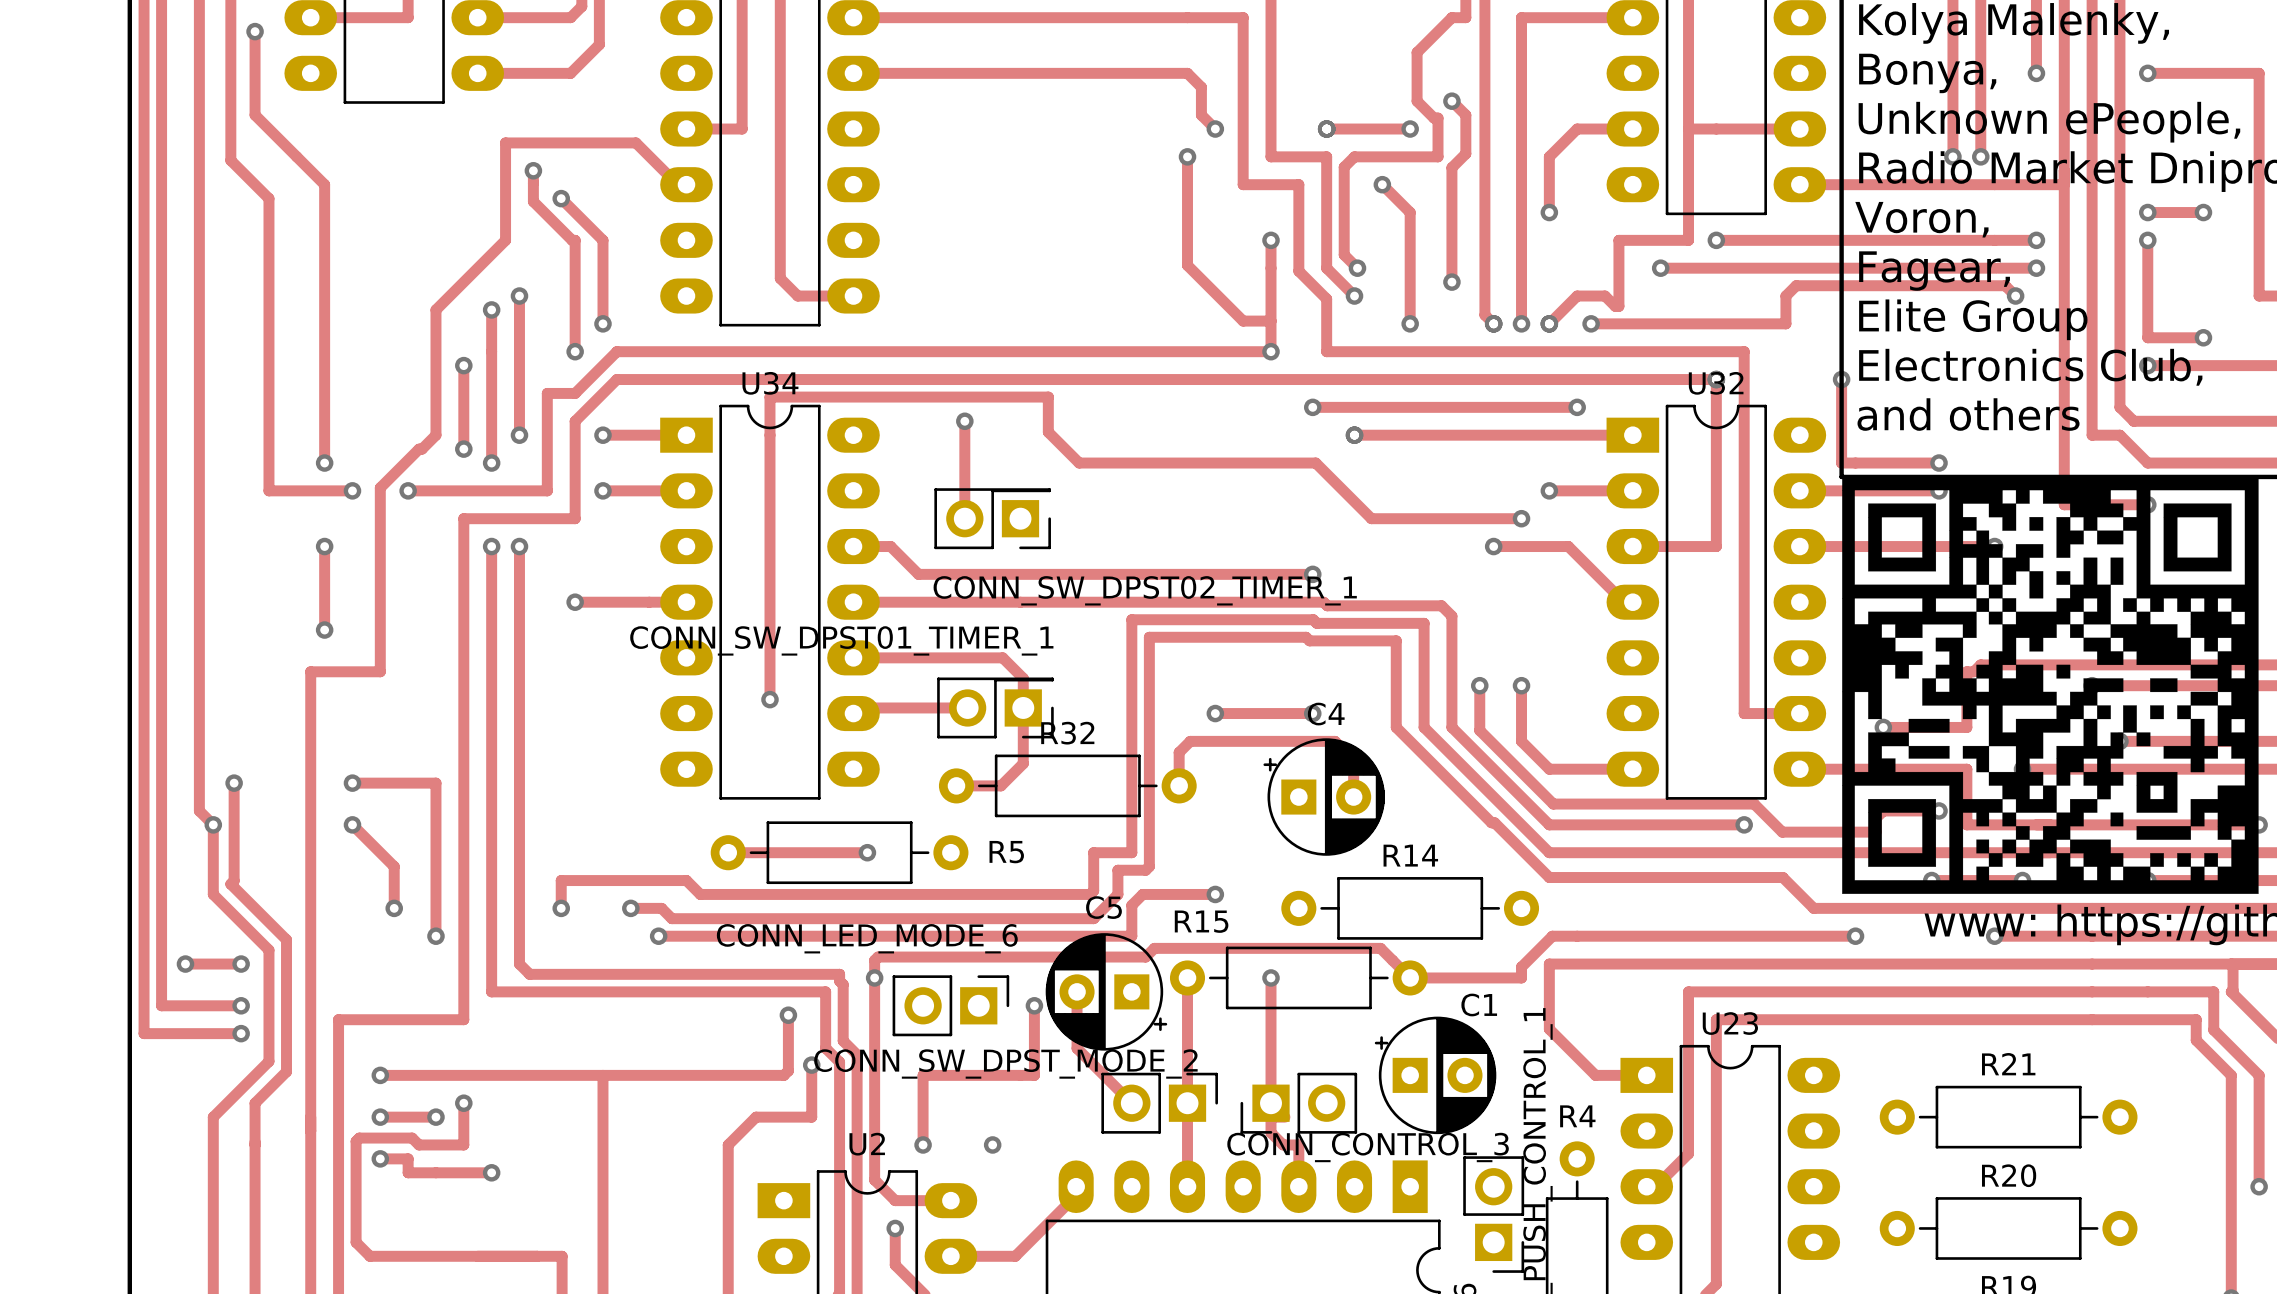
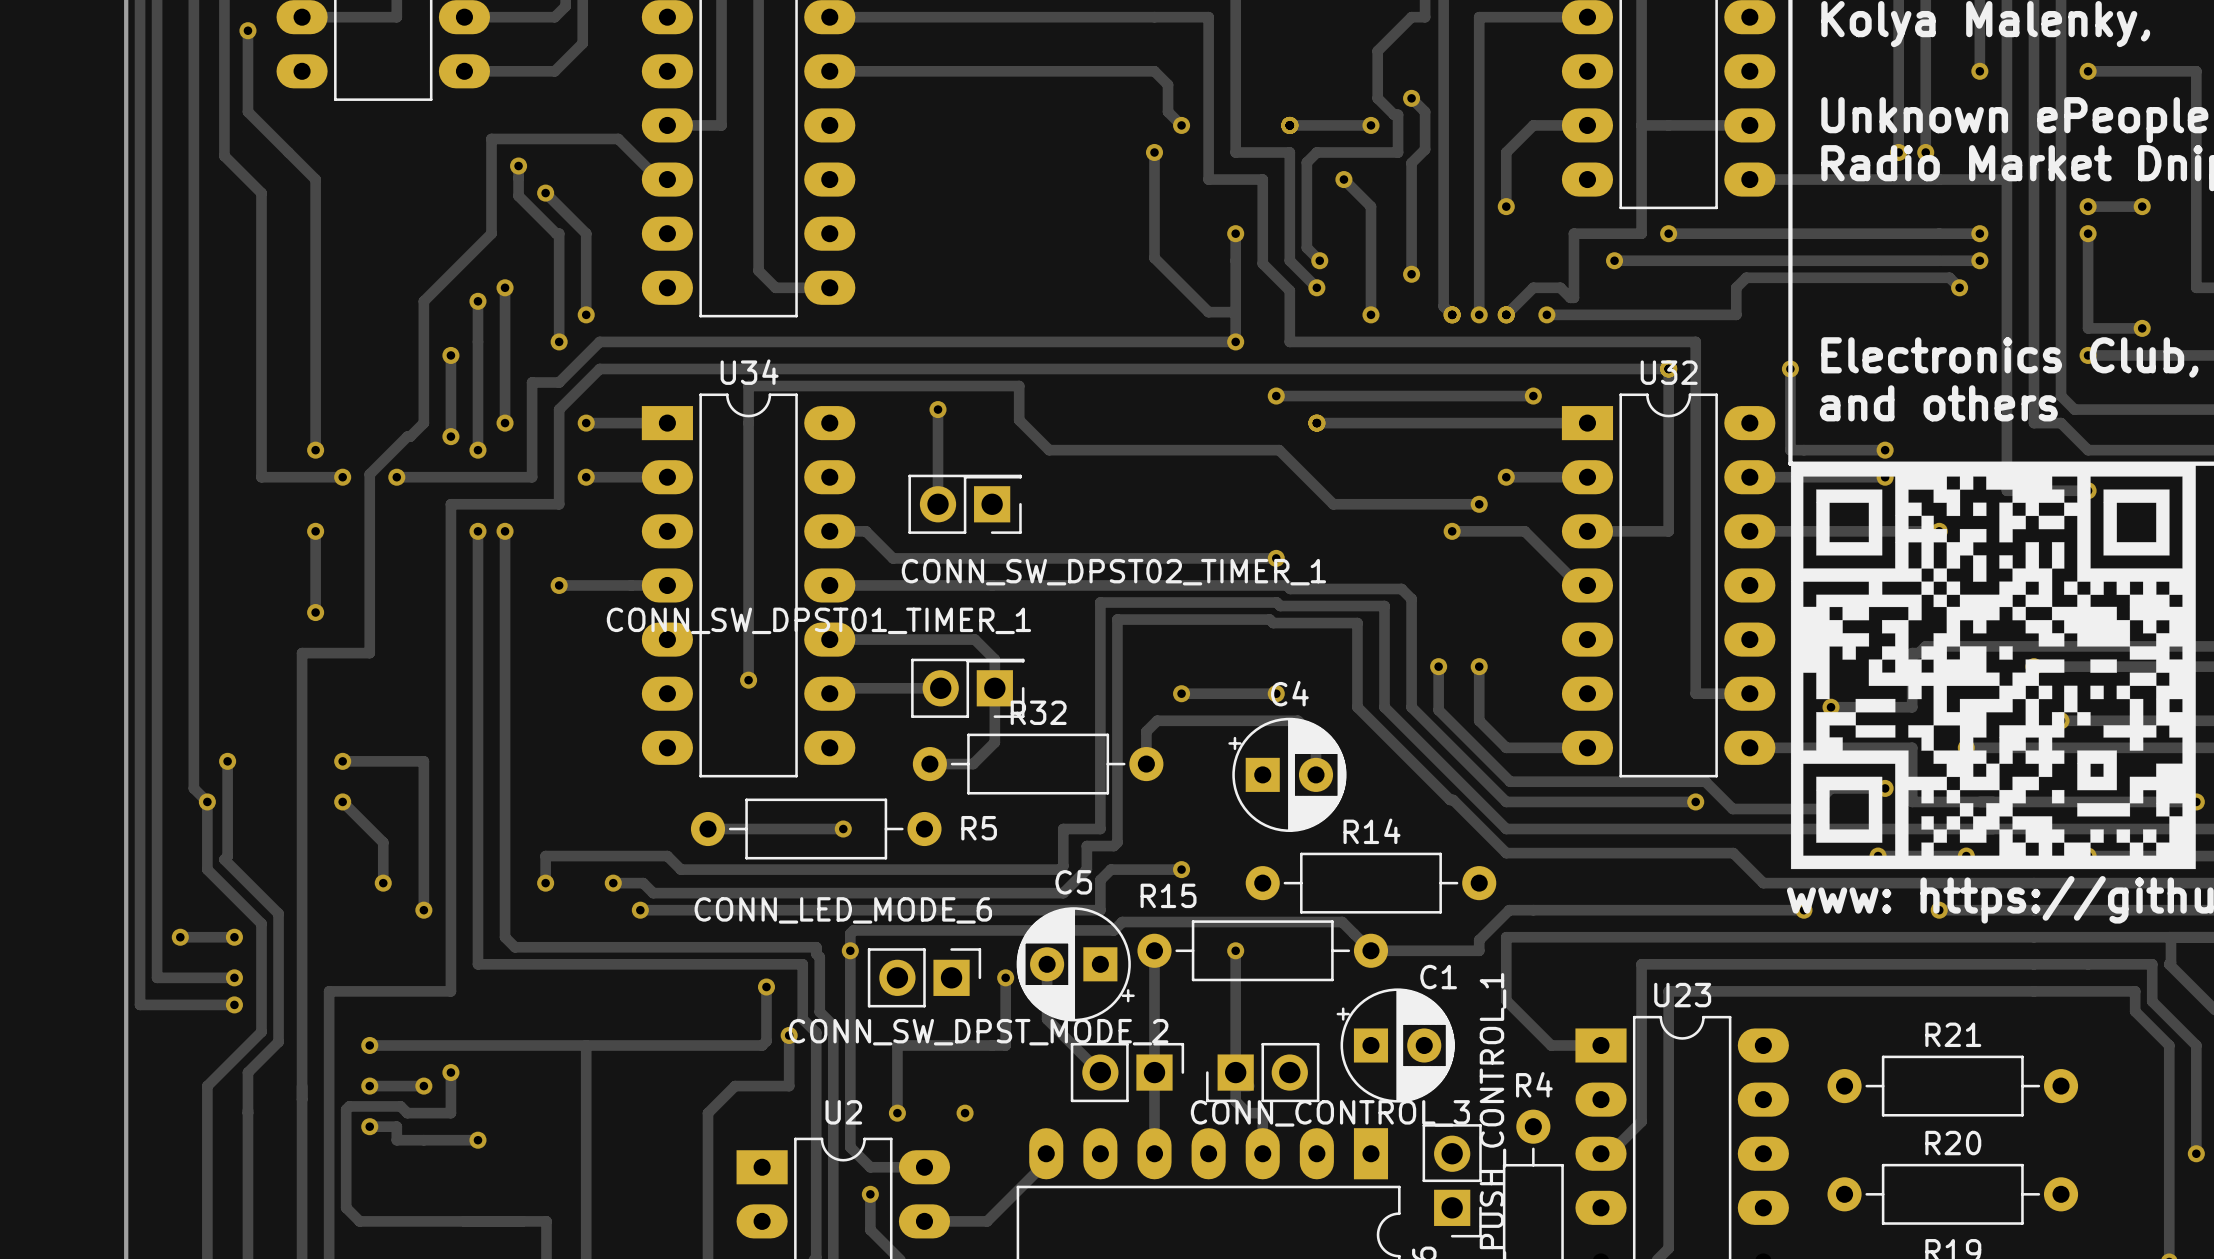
text: Bonya, (1927, 73) -> none
text: Voron, (1921, 219) -> none
text: Fagear, (1934, 271) -> none
text: Elite Group (1973, 319) -> none

